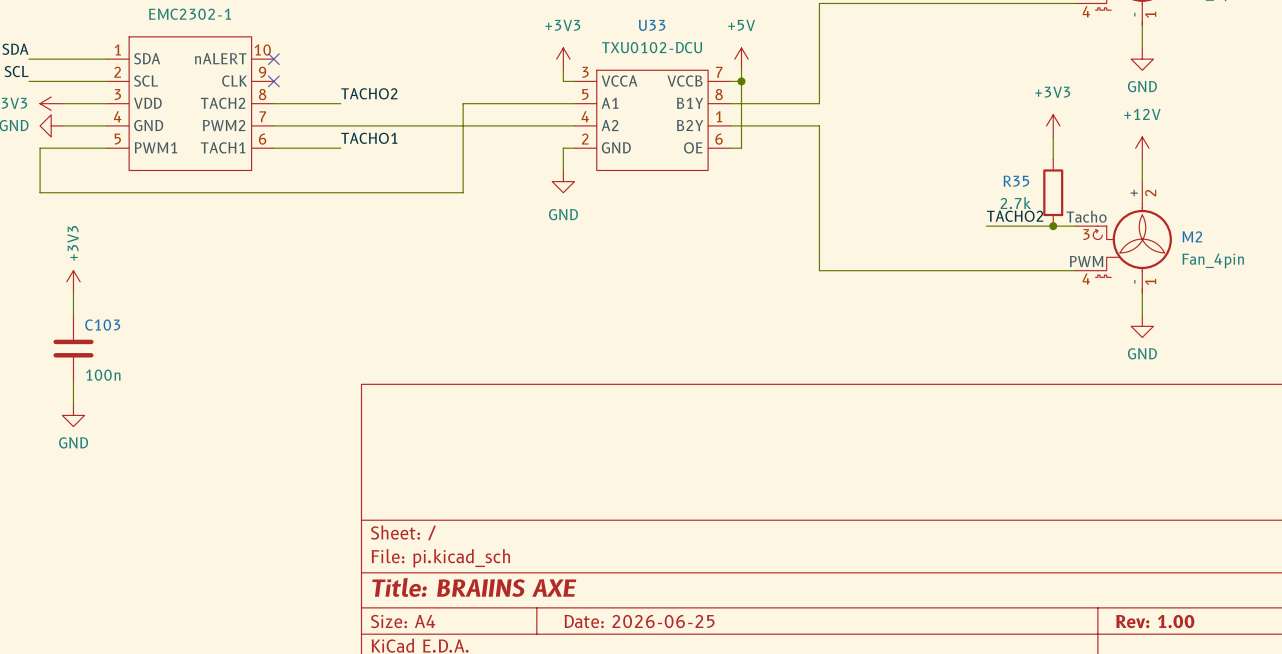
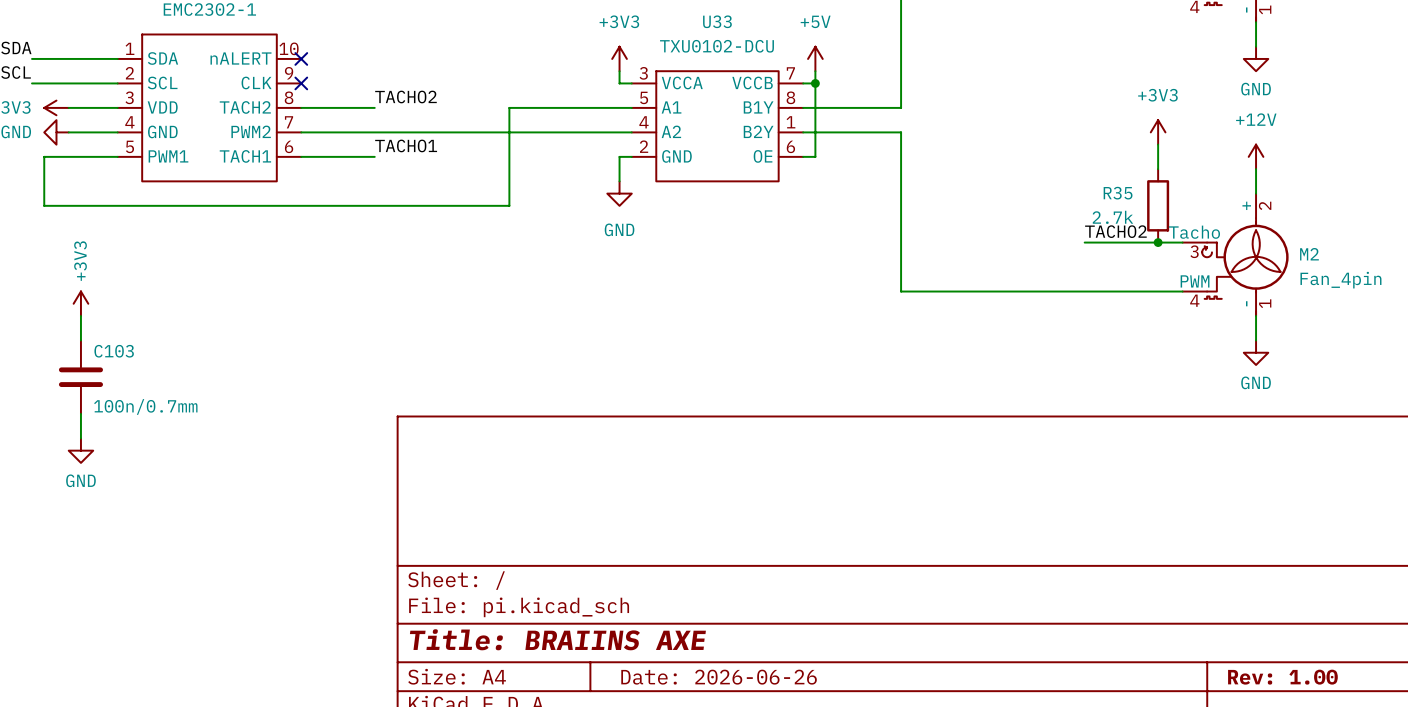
C103 value: 100n (103, 375) -> 100n/0.7mm (145, 406)
title block: Date: 2026-06-25 (639, 621) -> Date: 2026-06-26 (719, 677)

